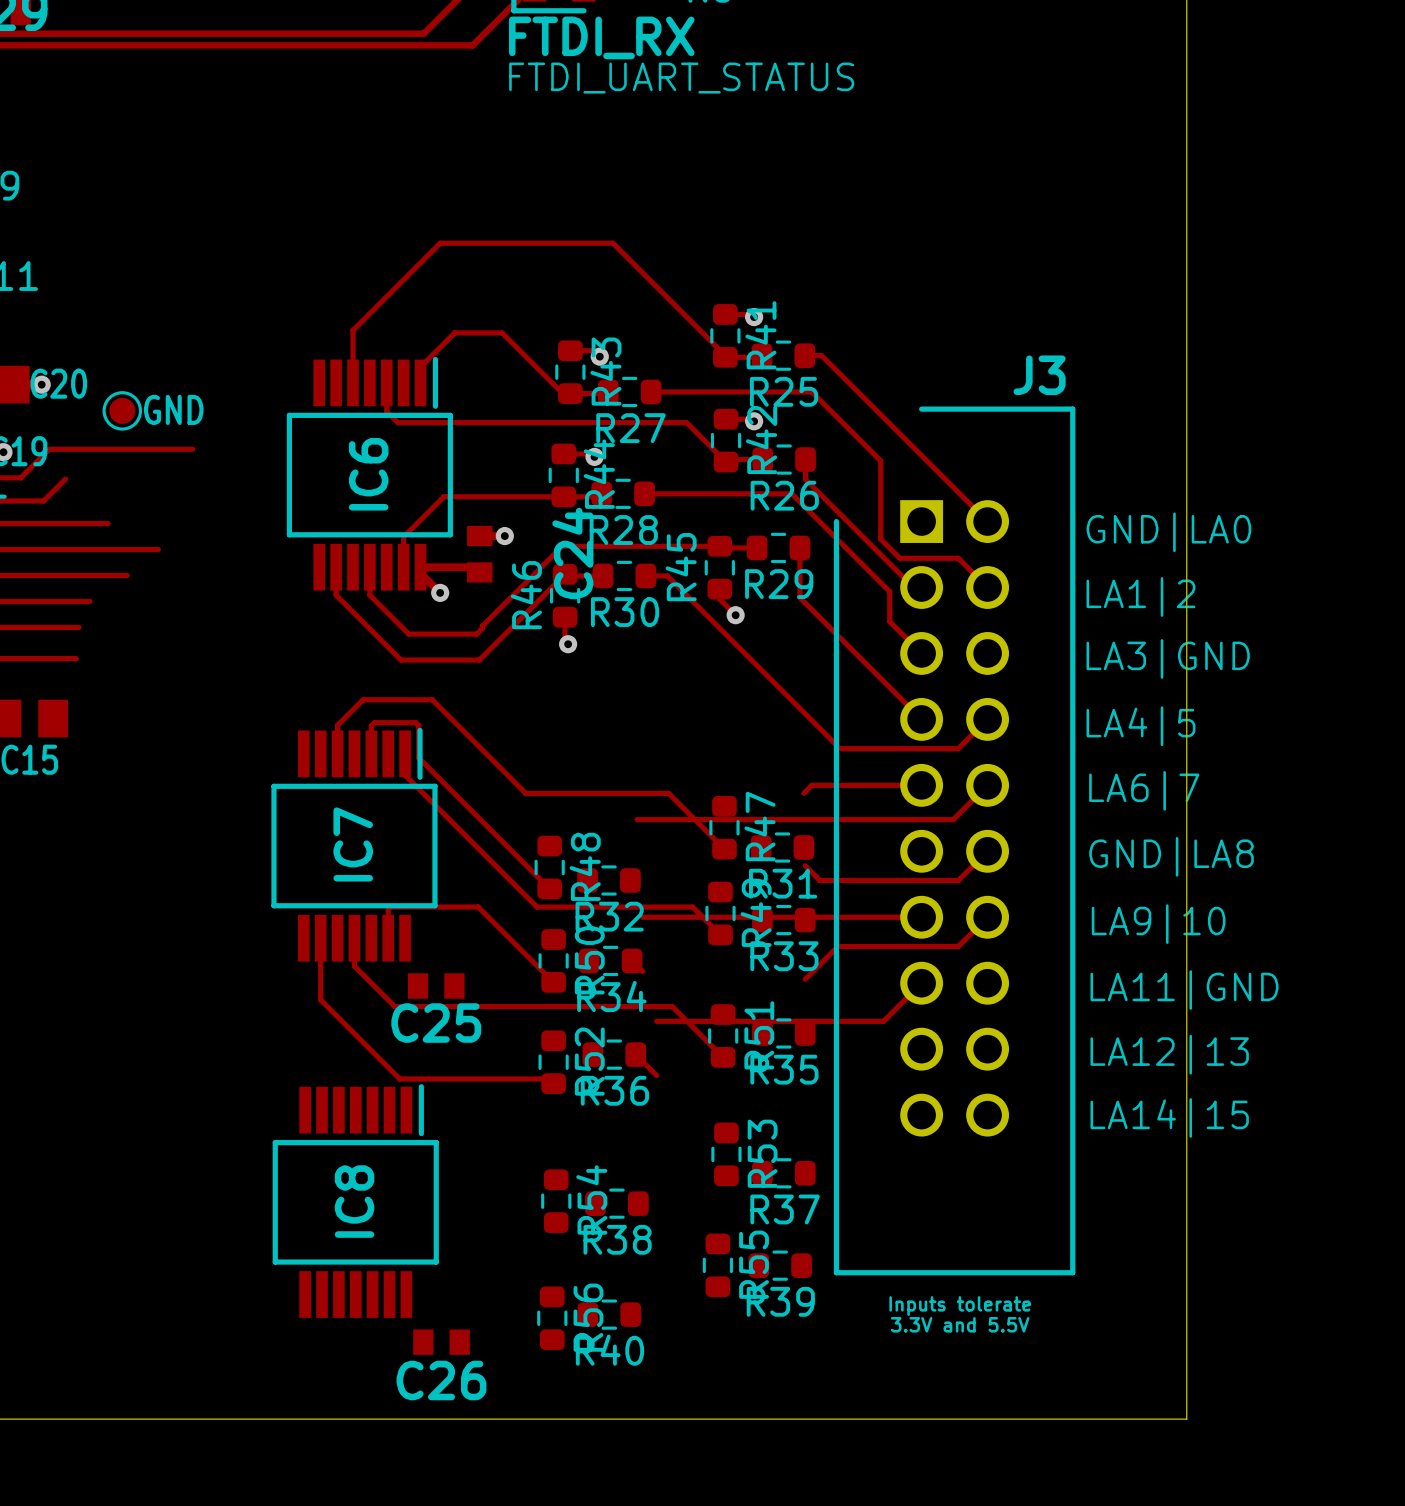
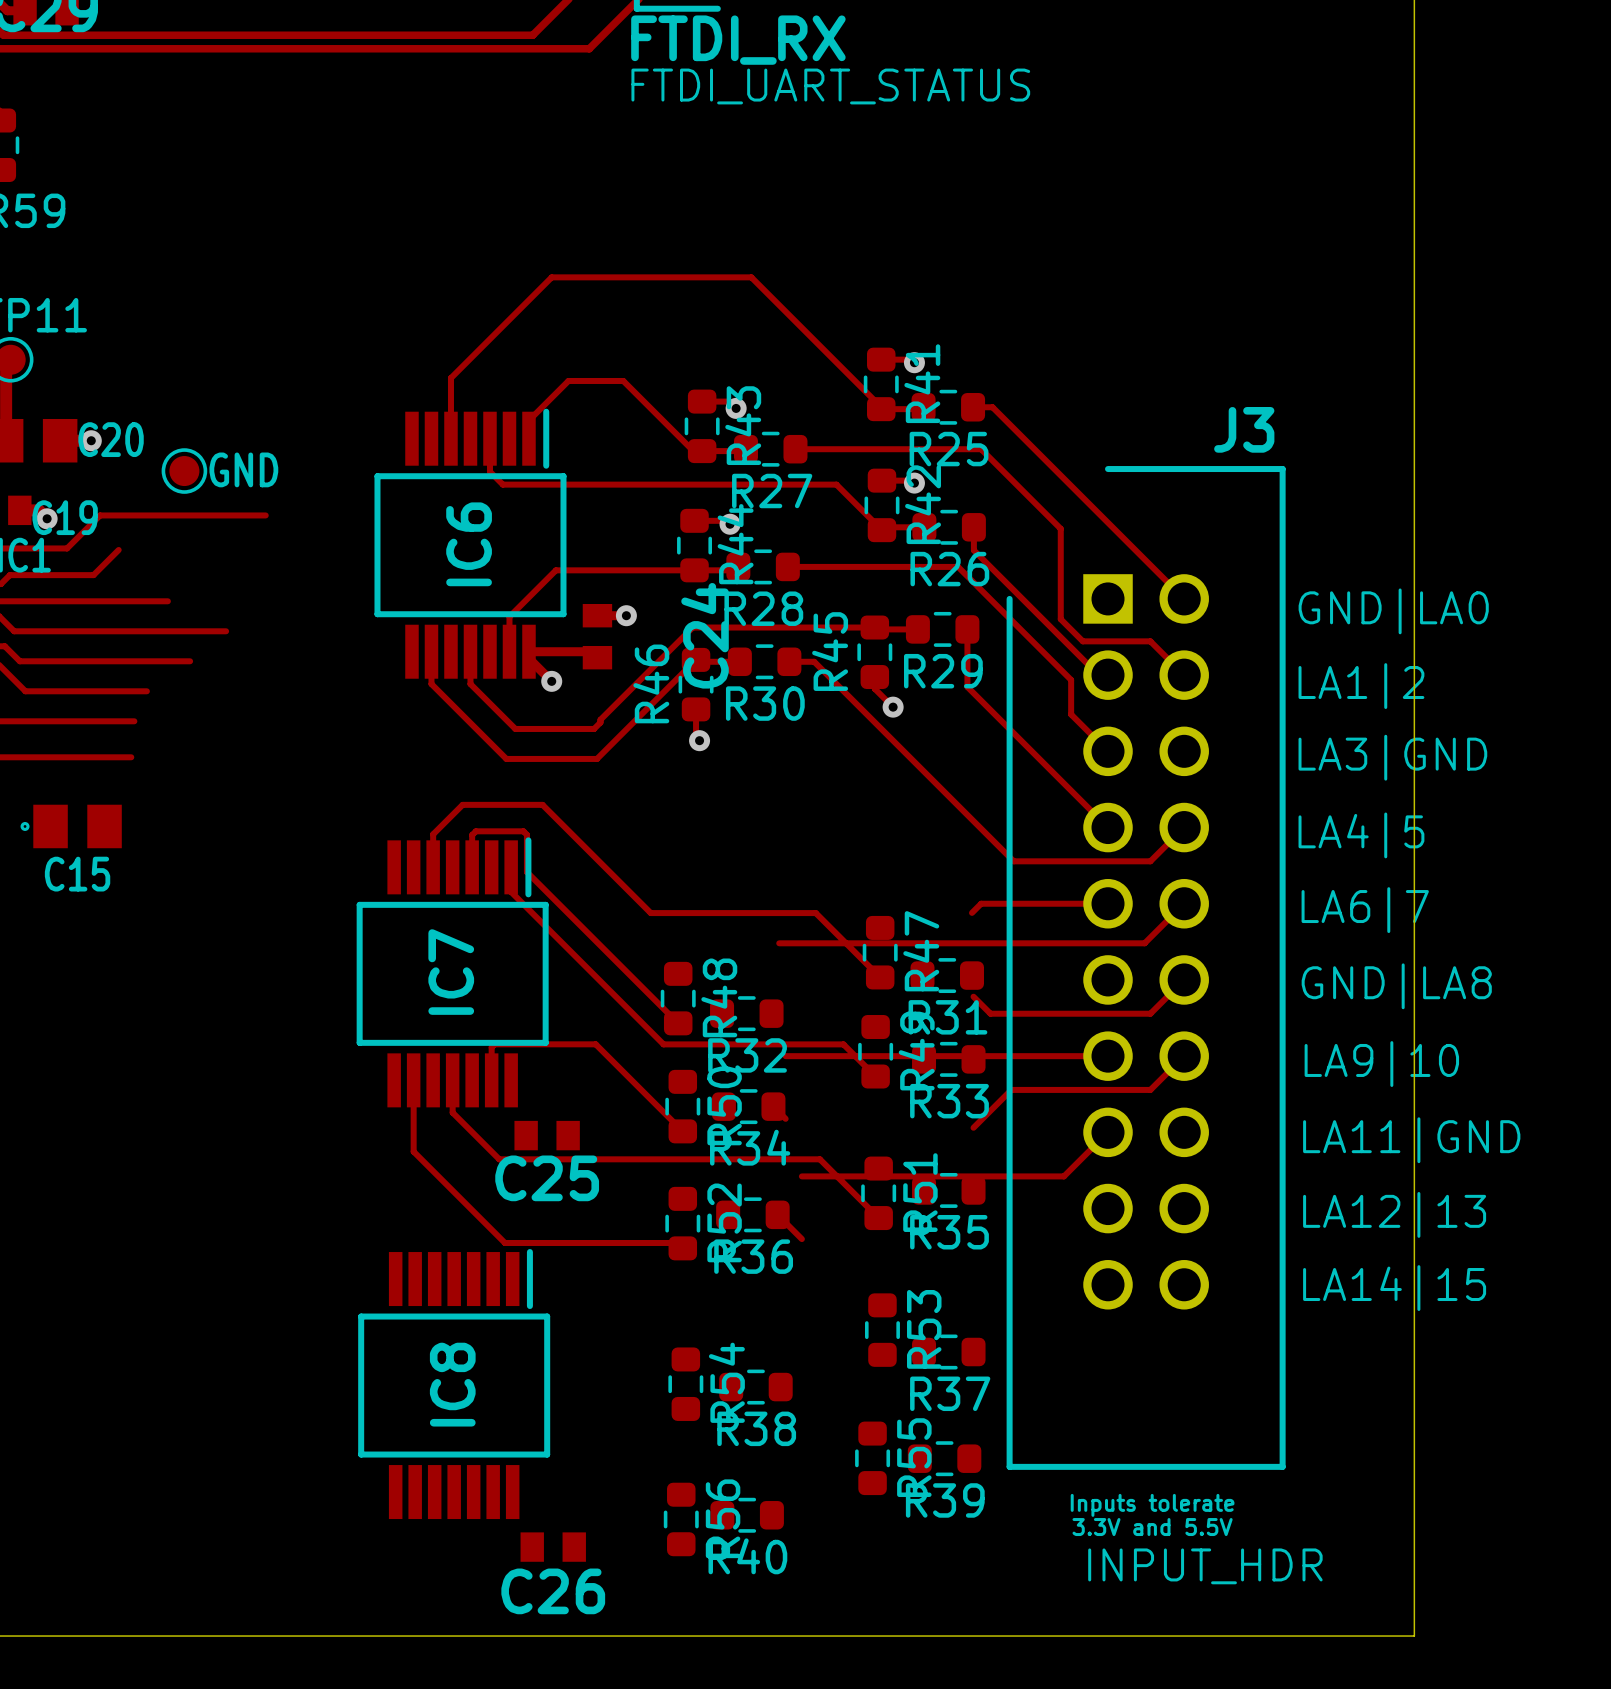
text: none -> INPUT_HDR (1205, 1566)

